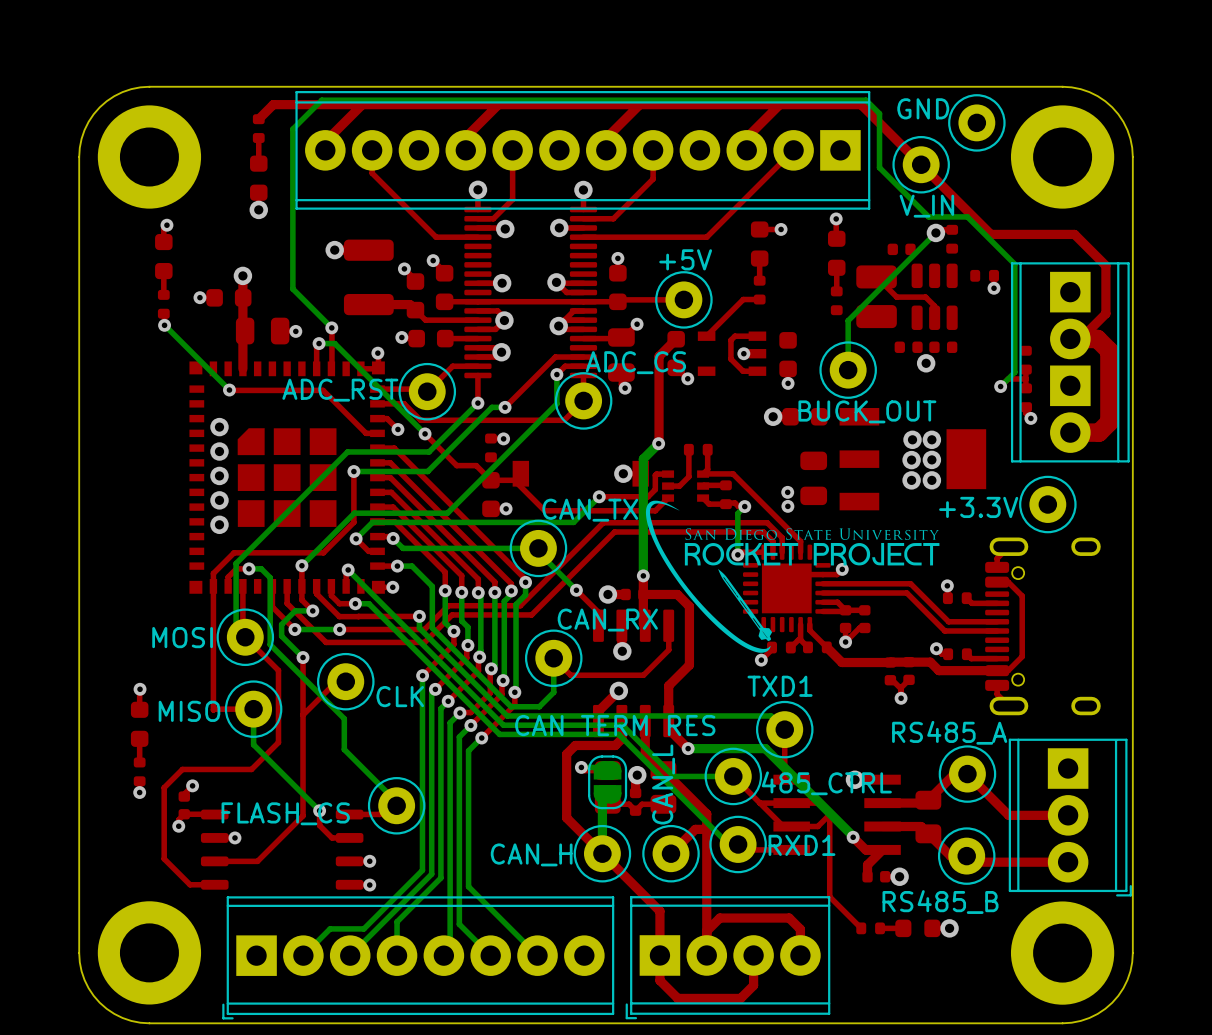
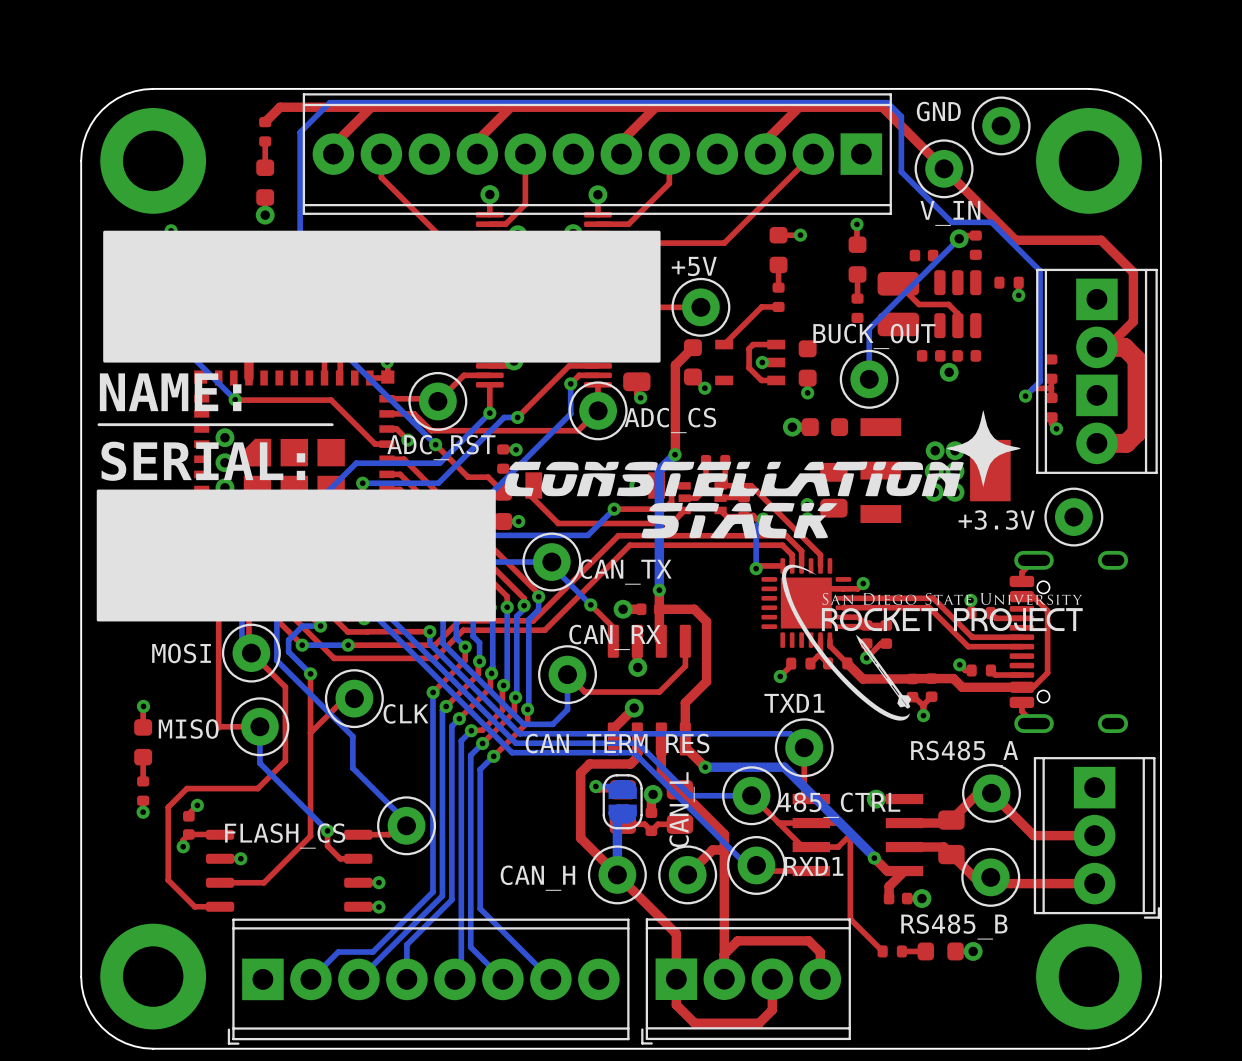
drawing: none -> [103, 230, 661, 363]
text position: ADC_CS (635, 362) -> ADC_CS (670, 420)
text: none -> NAME: (170, 392)
text position: ADC_RST (340, 390) -> ADC_RST (441, 447)
drawing: none -> [96, 410, 1021, 622]
text position: BUCK_OUT (867, 411) -> BUCK_OUT (874, 336)
line: none -> (332, 424) (98, 424)
text: none -> SERIAL: (203, 461)
text position: CAN_TX (590, 510) -> CAN_TX (625, 572)
drawing position: (792, 576) -> (932, 642)

